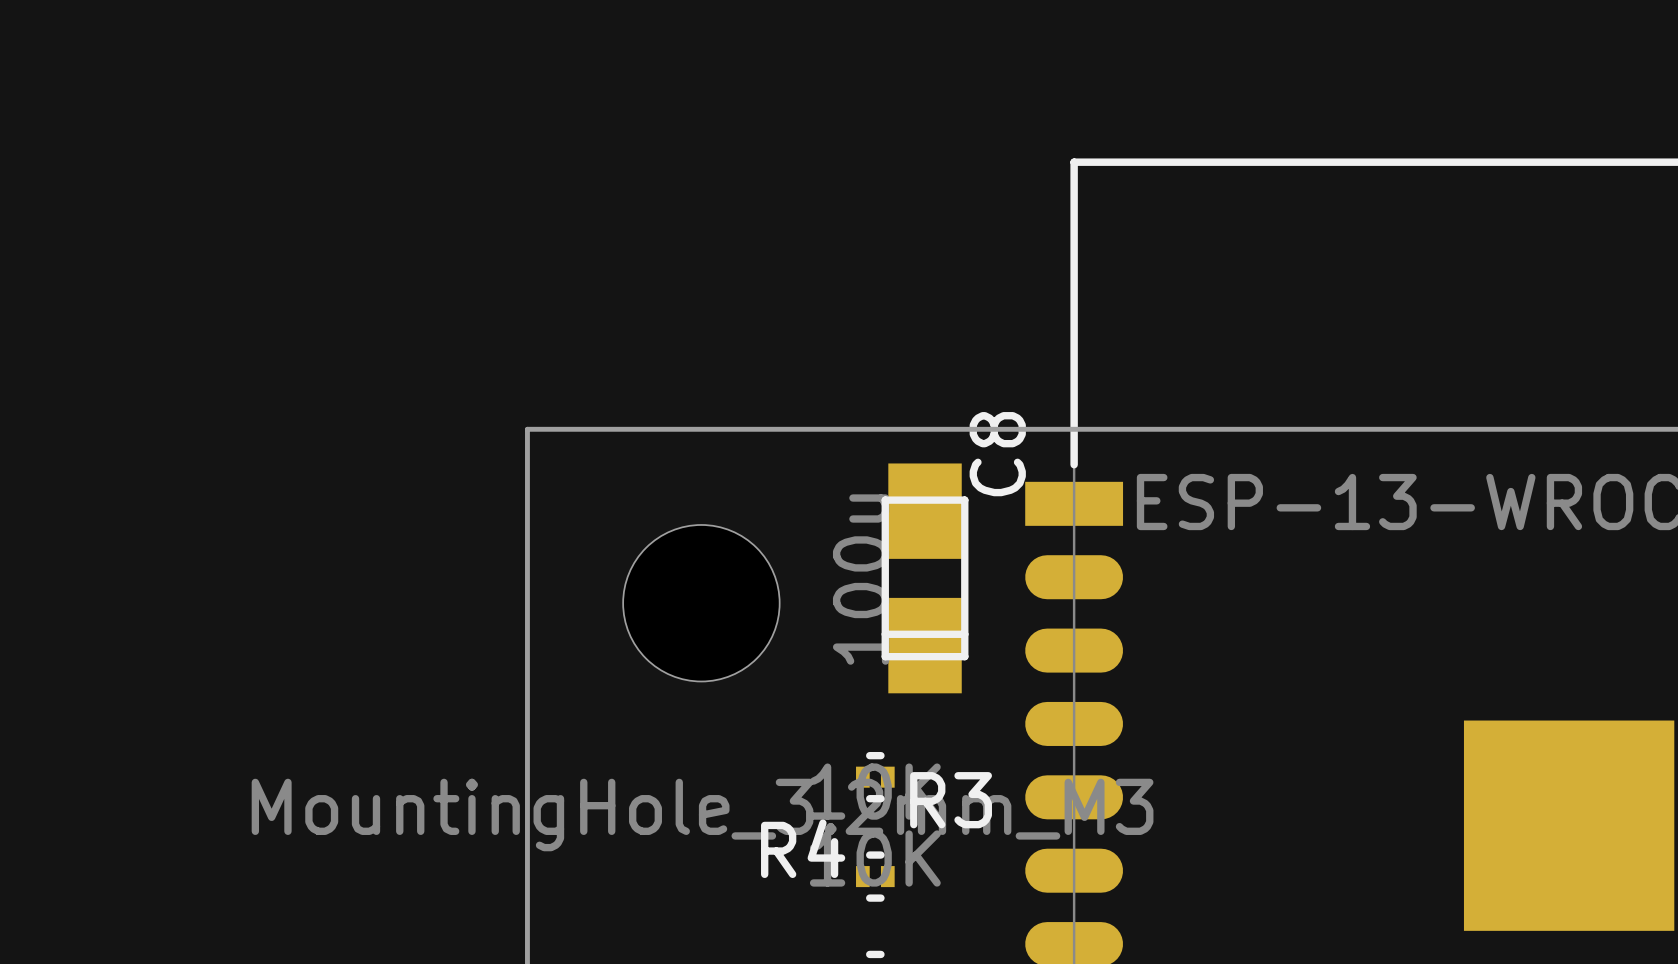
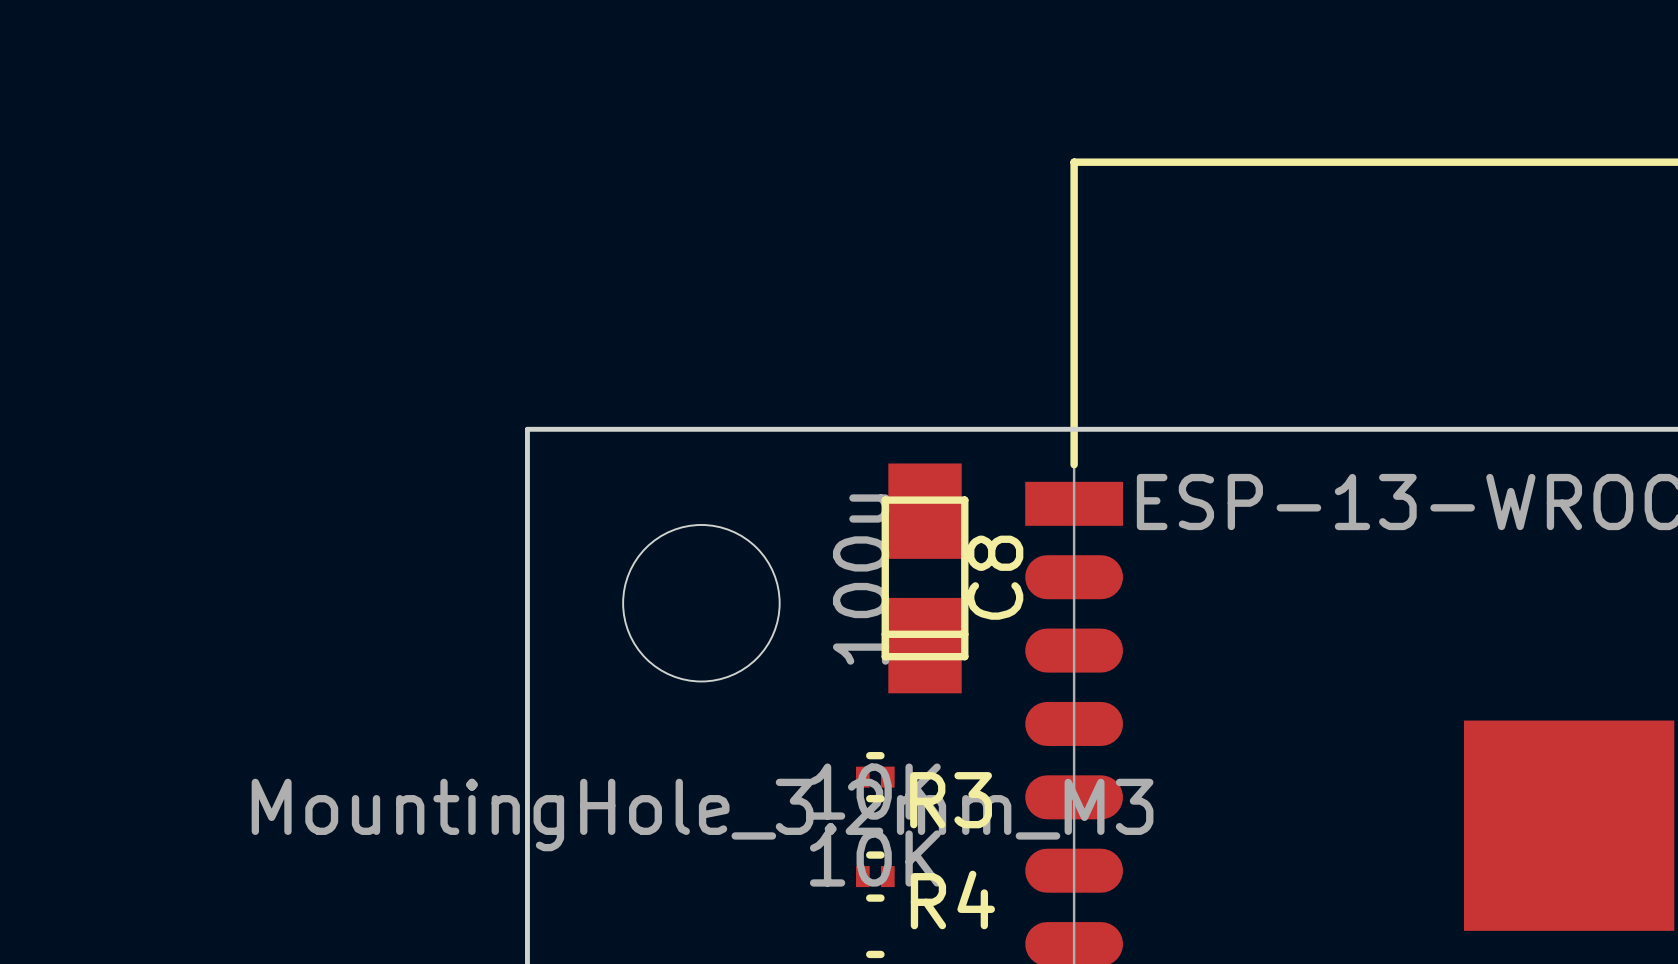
C8 name position: C8 (997, 454) -> C8 (995, 577)
R4 name position: R4 (803, 848) -> R4 (952, 899)

